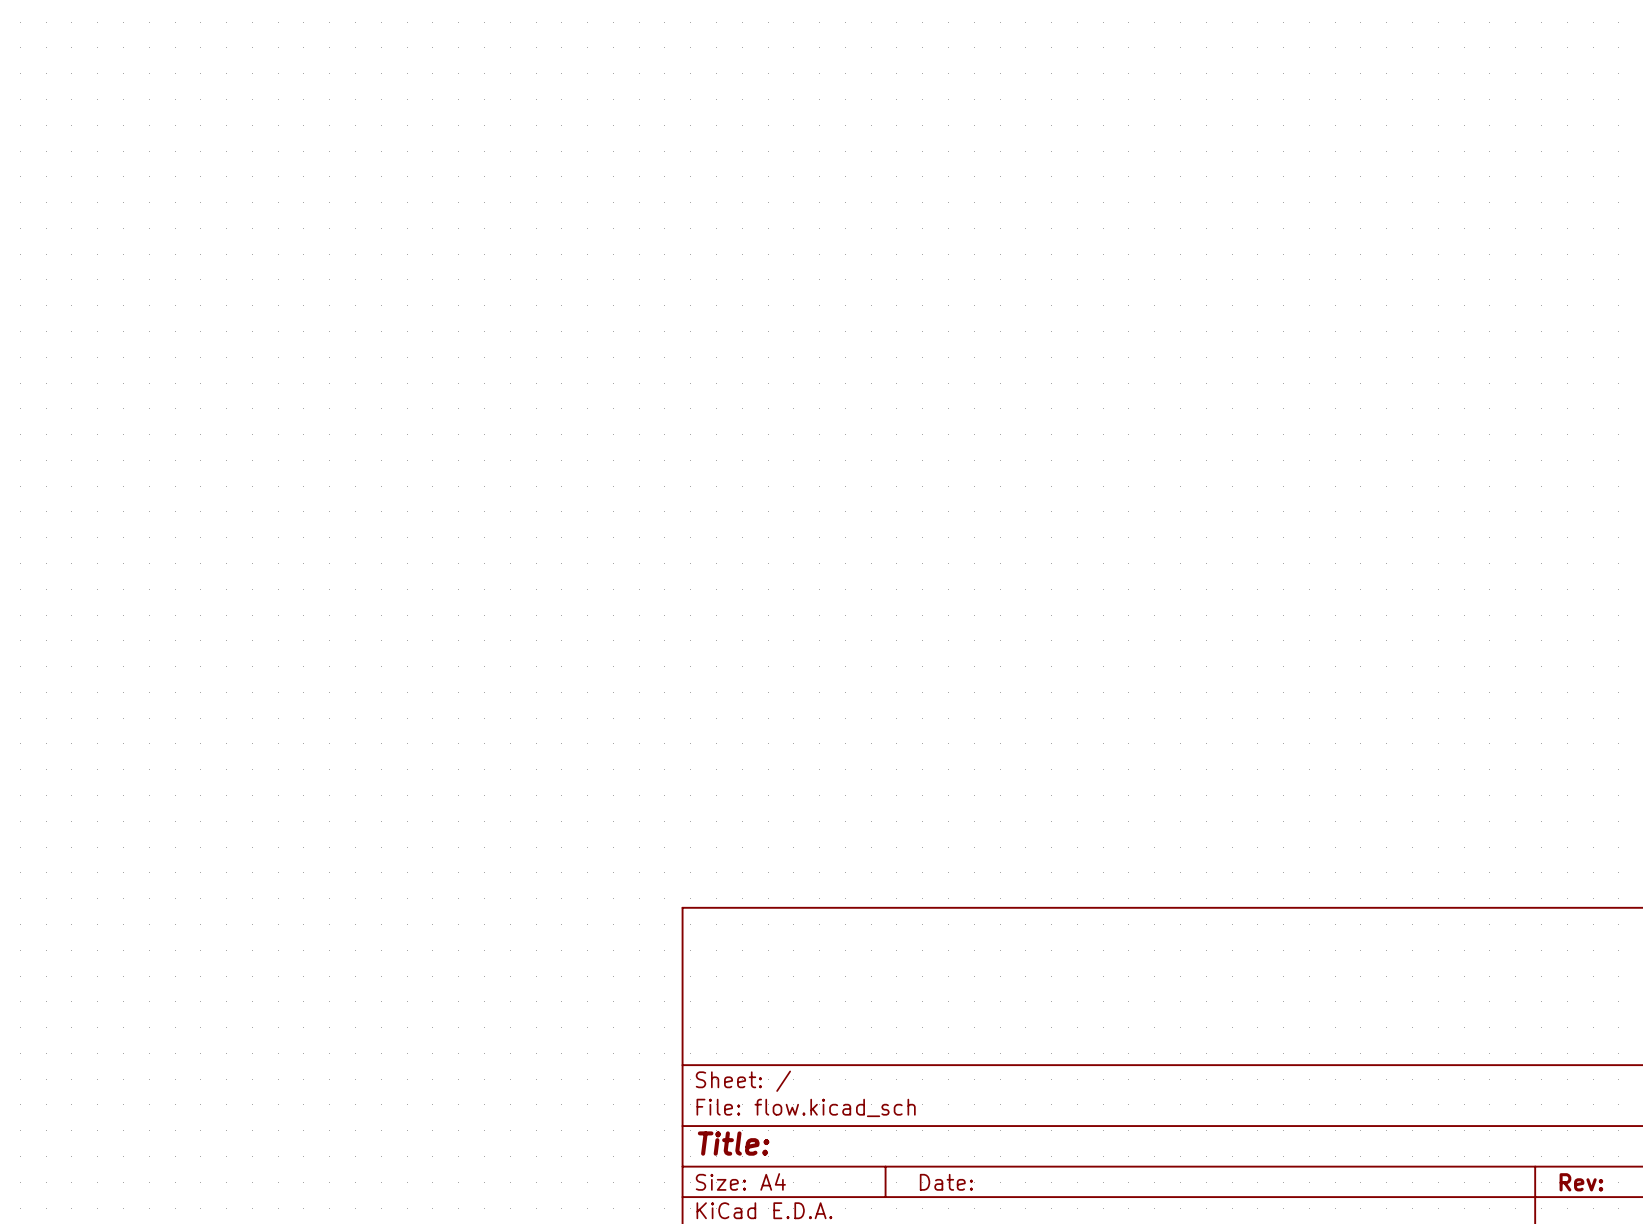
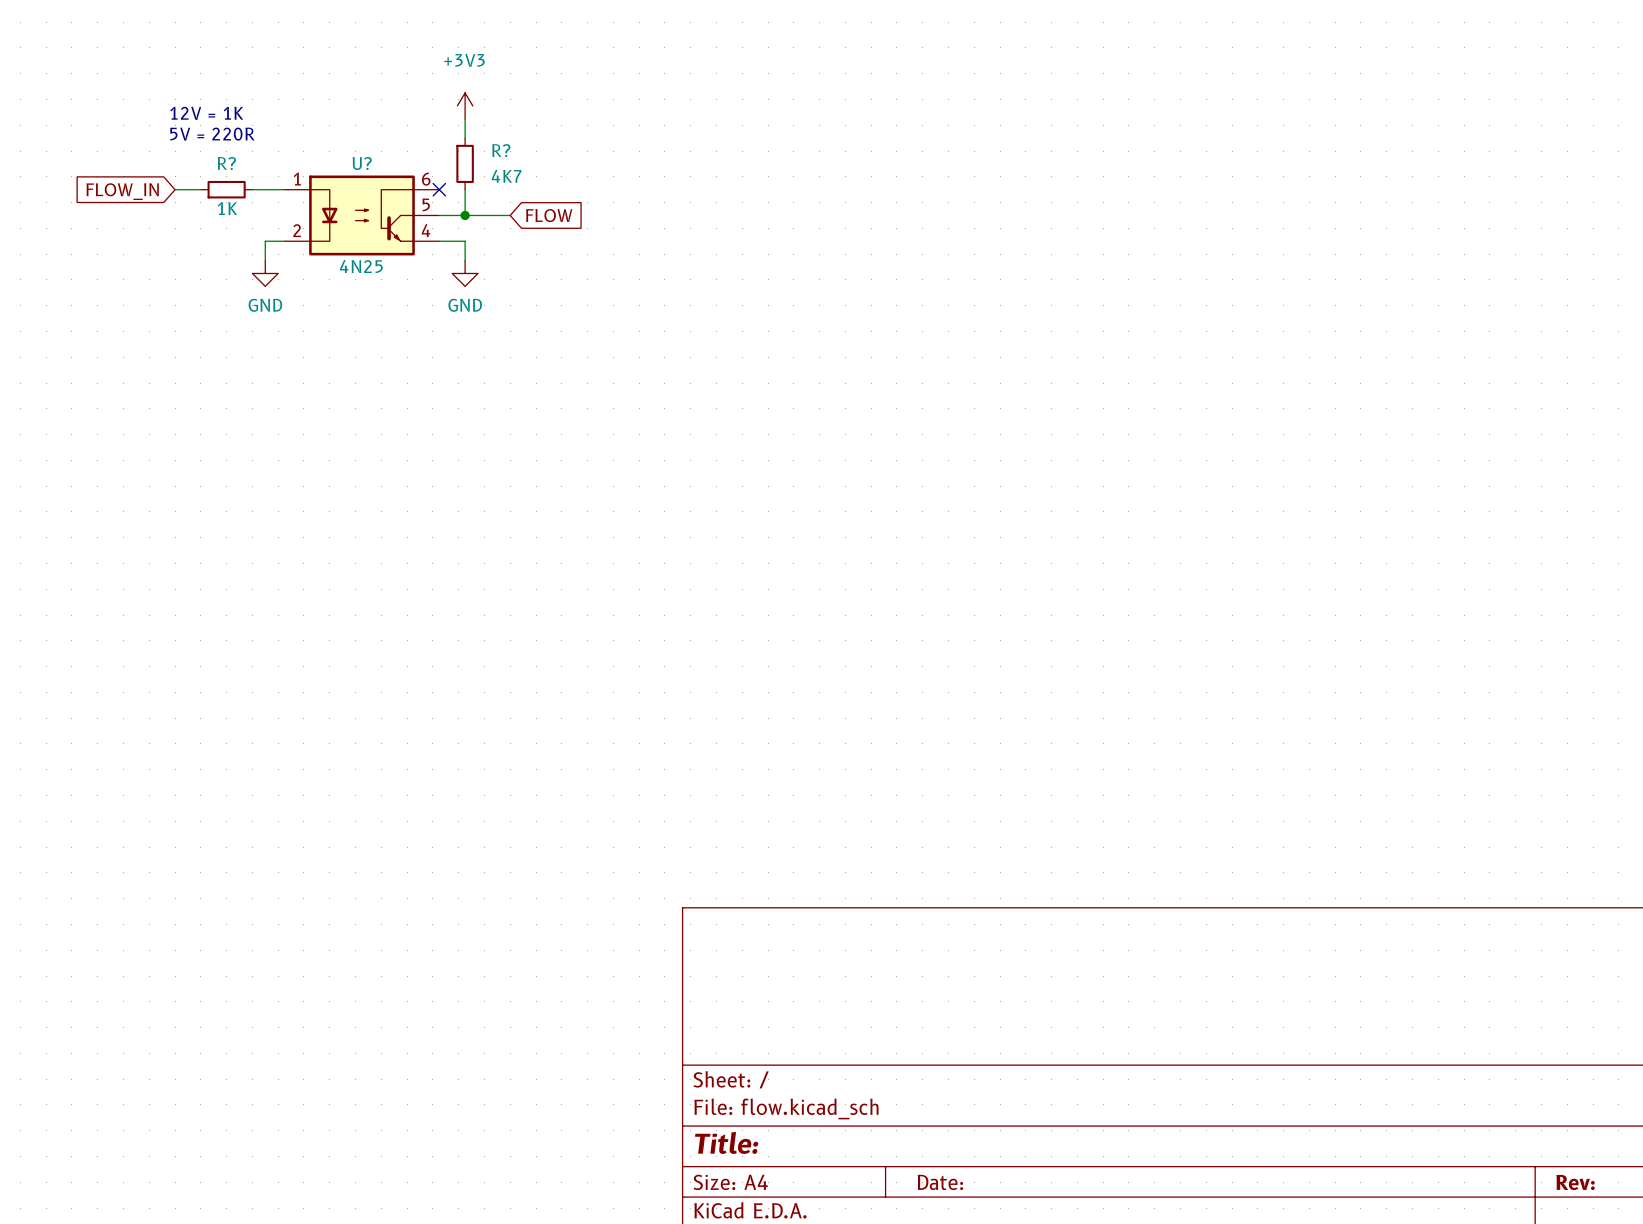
power symbol: none -> +3V3 (465, 105)
text: none -> 12V = 1K (206, 113)
wire: none -> (465, 118) (465, 138)
text: none -> 5V = 220R (212, 134)
R?: none -> 4K7 (465, 163)
wire: none -> (175, 189) (200, 189)
R?: none -> 1K (226, 189)
wire: none -> (252, 189) (284, 189)
no-connect mark: none -> (439, 189)
wire: none -> (465, 189) (465, 215)
global label: none -> FLOW_IN (122, 191)
U?: none -> 4N25 (361, 215)
wire: none -> (439, 215) (510, 215)
junction: none -> (465, 215)
global label: none -> FLOW (549, 215)
wire: none -> (284, 241) (265, 241) (265, 260)
wire: none -> (439, 241) (465, 241) (465, 260)
power symbol: none -> GND (265, 273)
power symbol: none -> GND (465, 273)

